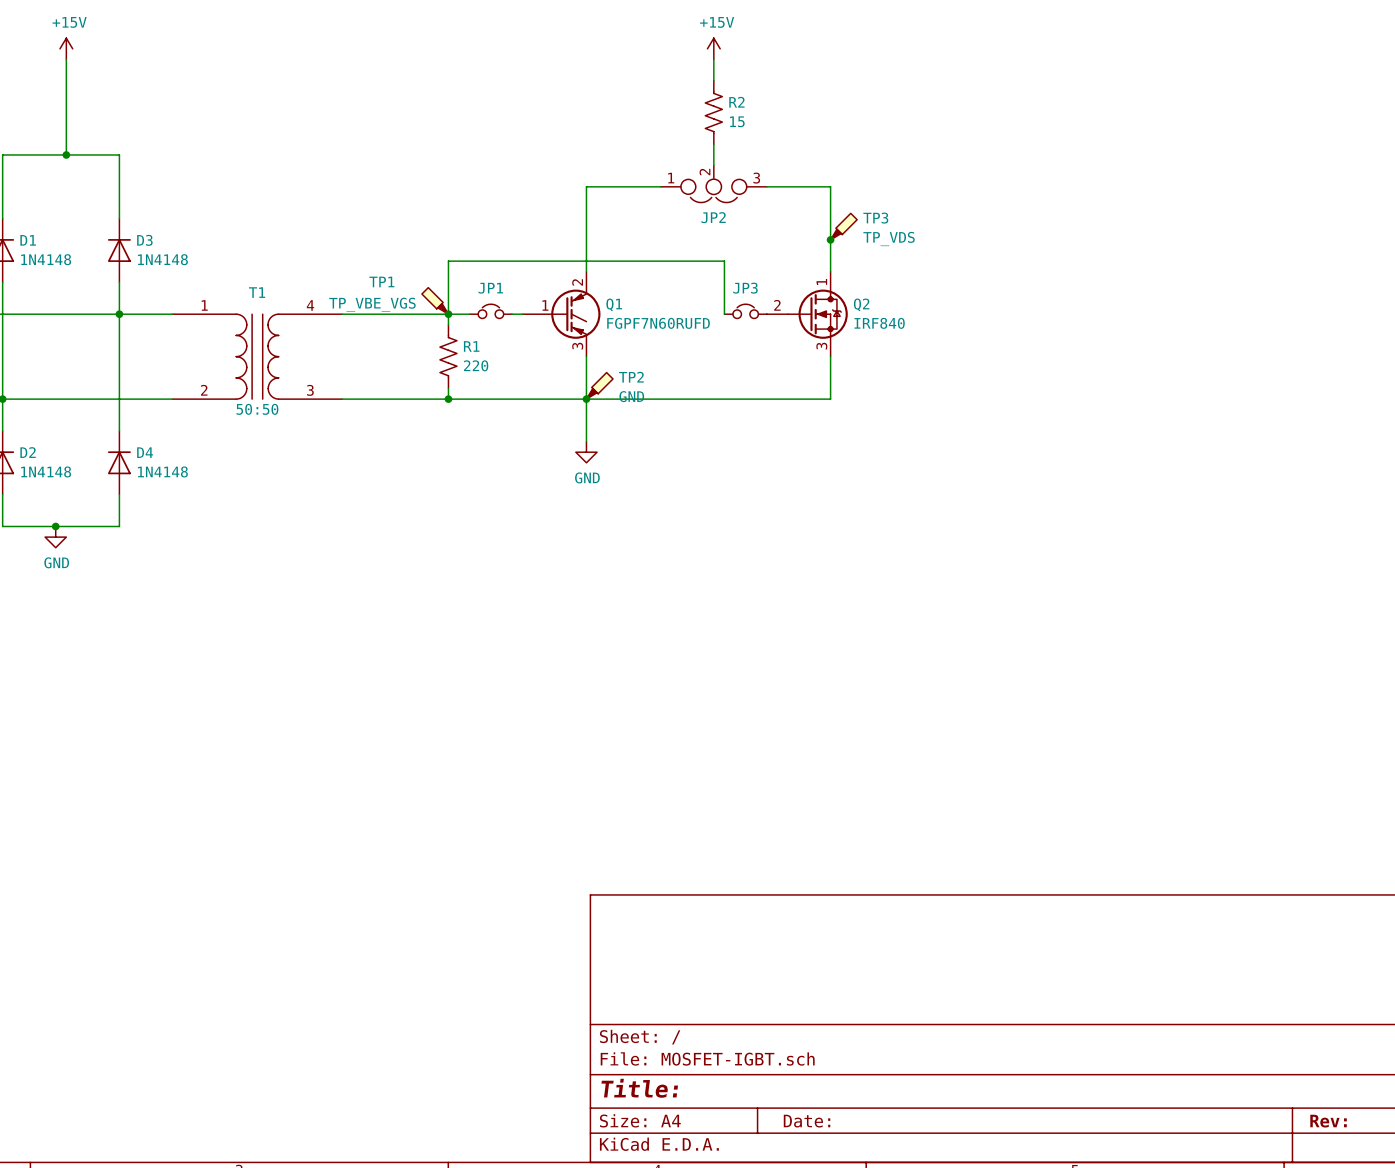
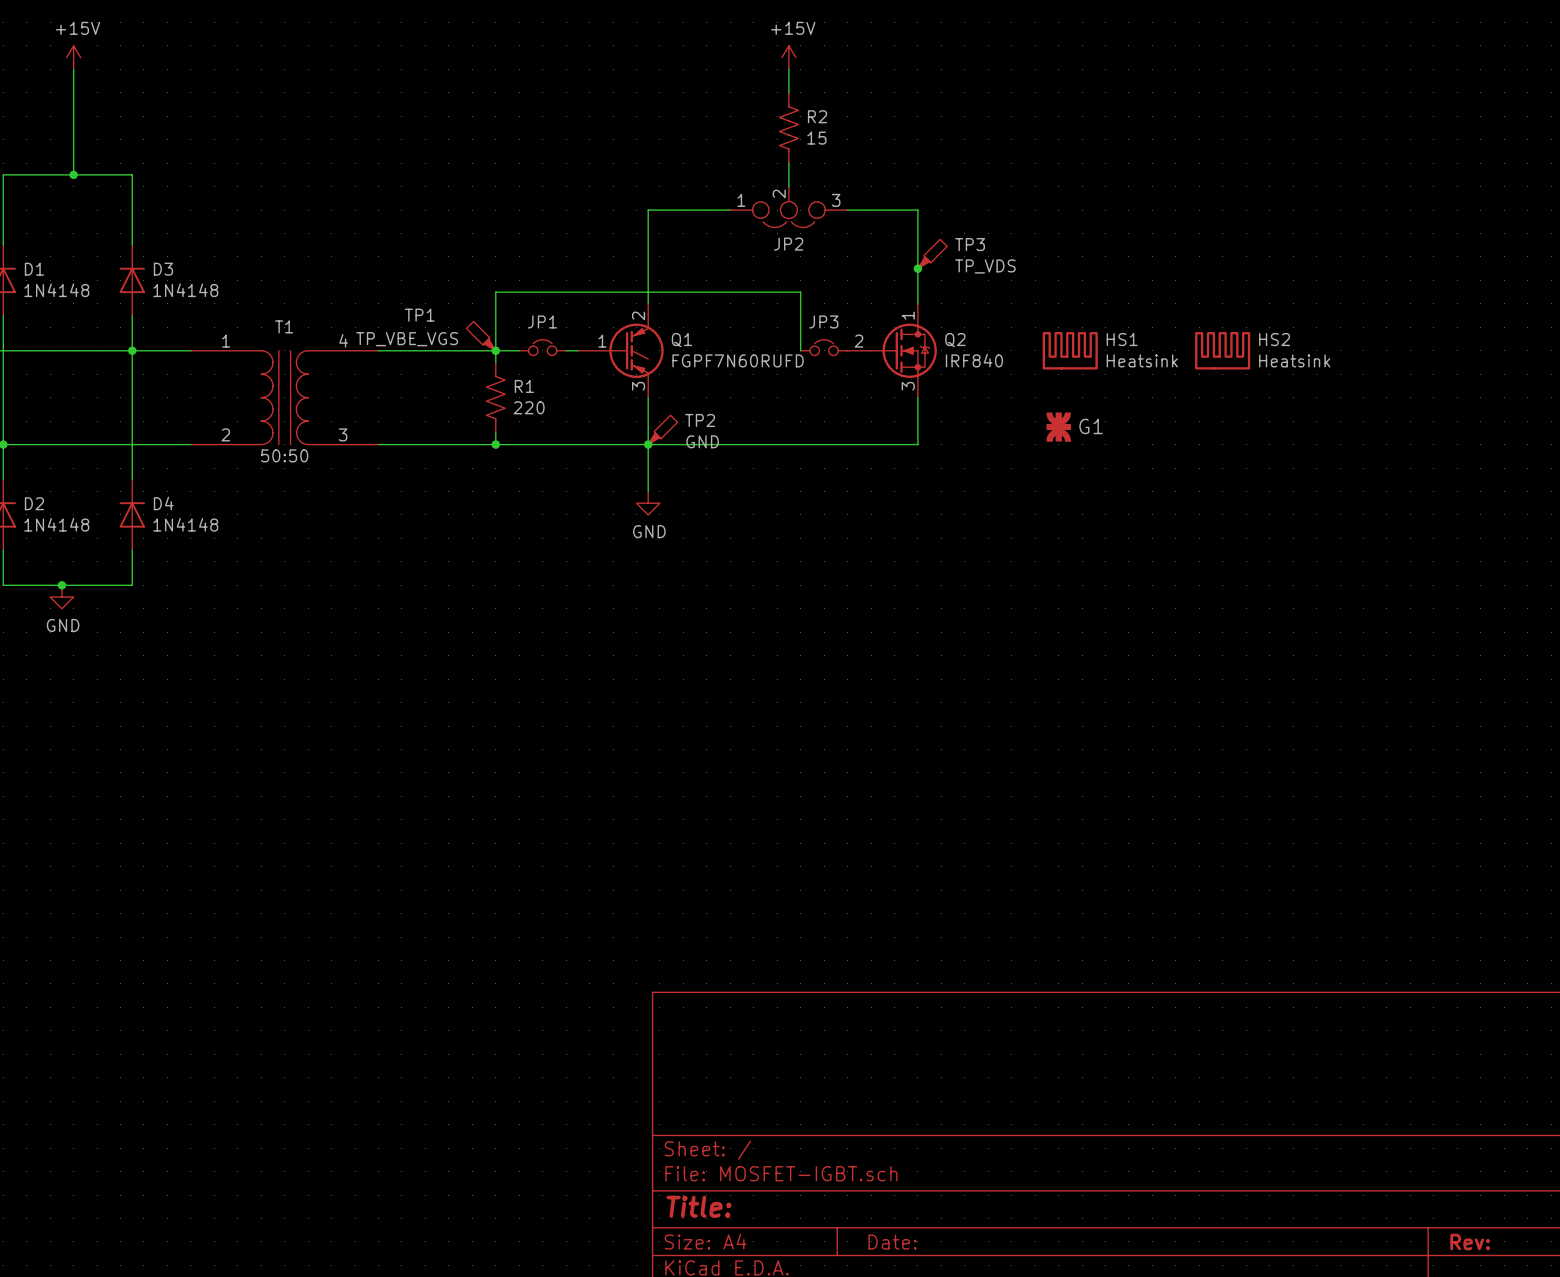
HS1: none -> Heatsink (1070, 350)
HS2: none -> Heatsink (1222, 350)
G1: none -> (1058, 427)

